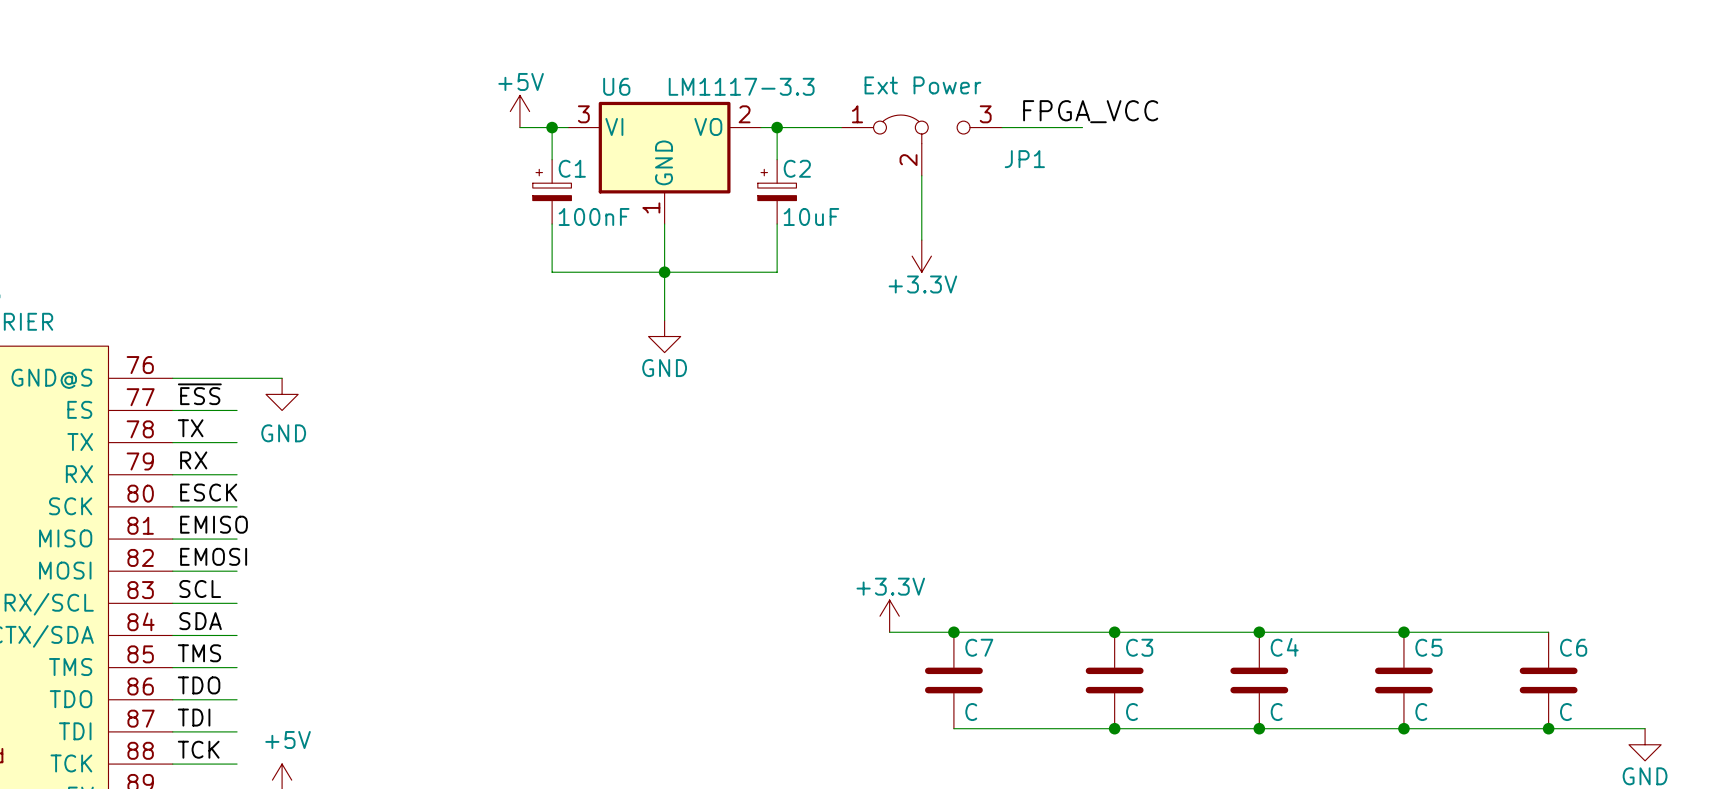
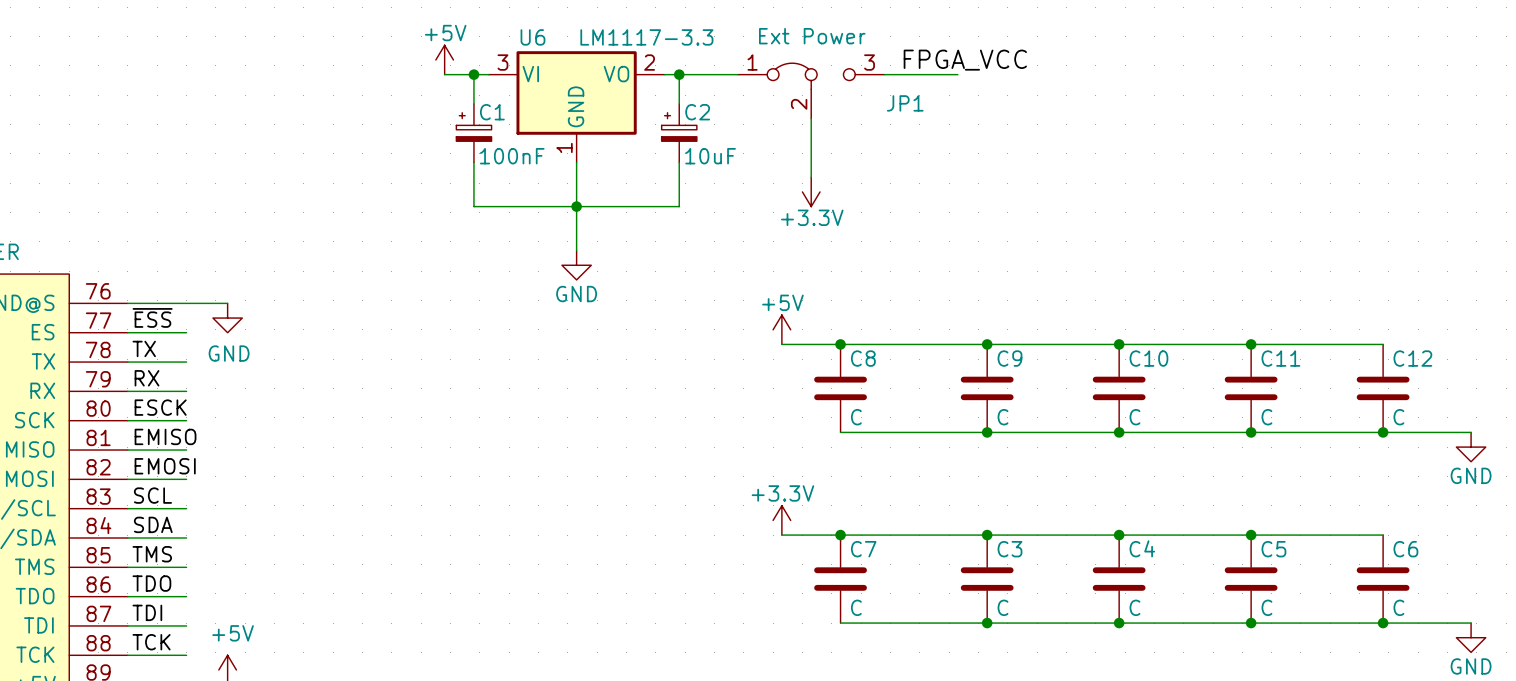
power symbol: none -> +5V (781, 329)
wire: none -> (781, 344) (1383, 344)
junction: none -> (840, 344)
junction: none -> (987, 344)
junction: none -> (1119, 344)
junction: none -> (1251, 344)
C8: none -> C (840, 388)
C9: none -> C (987, 388)
C10: none -> C (1119, 388)
C11: none -> C (1251, 388)
C12: none -> C (1383, 388)
wire: none -> (840, 432) (1471, 432)
junction: none -> (987, 432)
junction: none -> (1119, 432)
junction: none -> (1251, 432)
junction: none -> (1383, 432)
power symbol: none -> GND (1471, 447)

